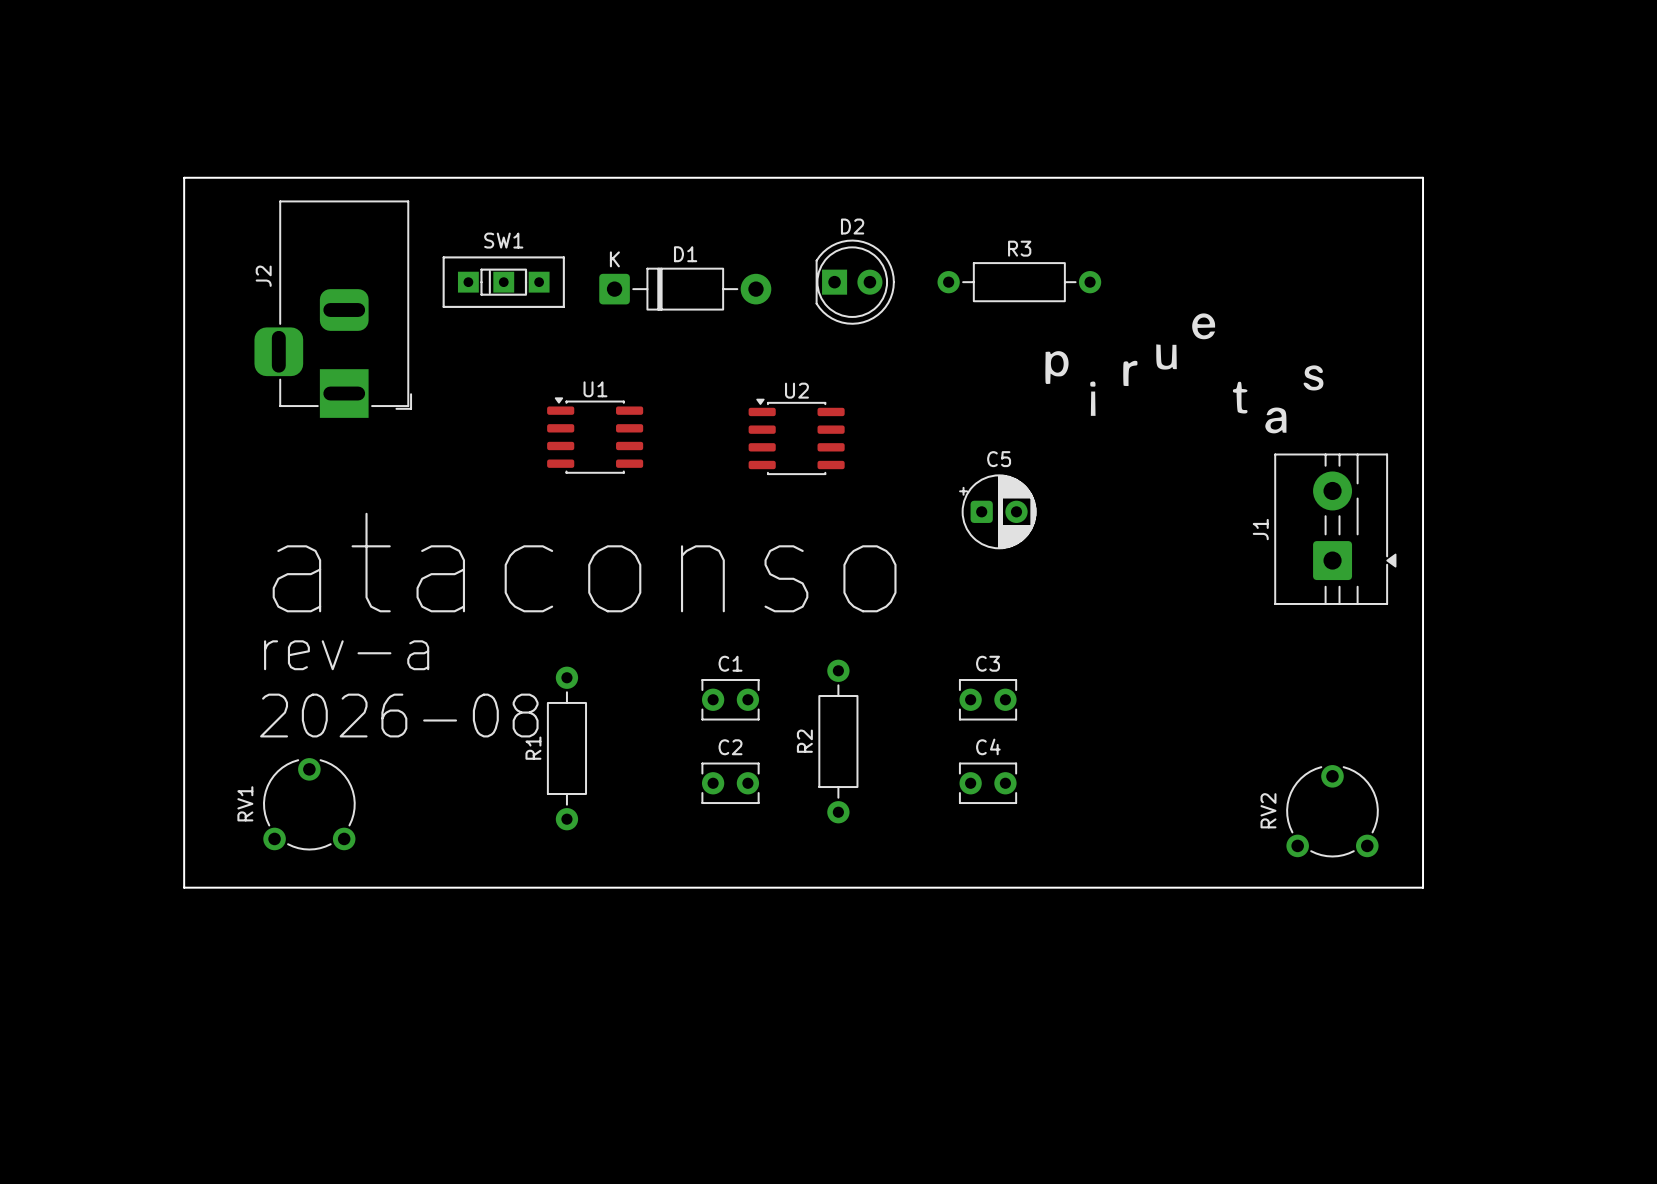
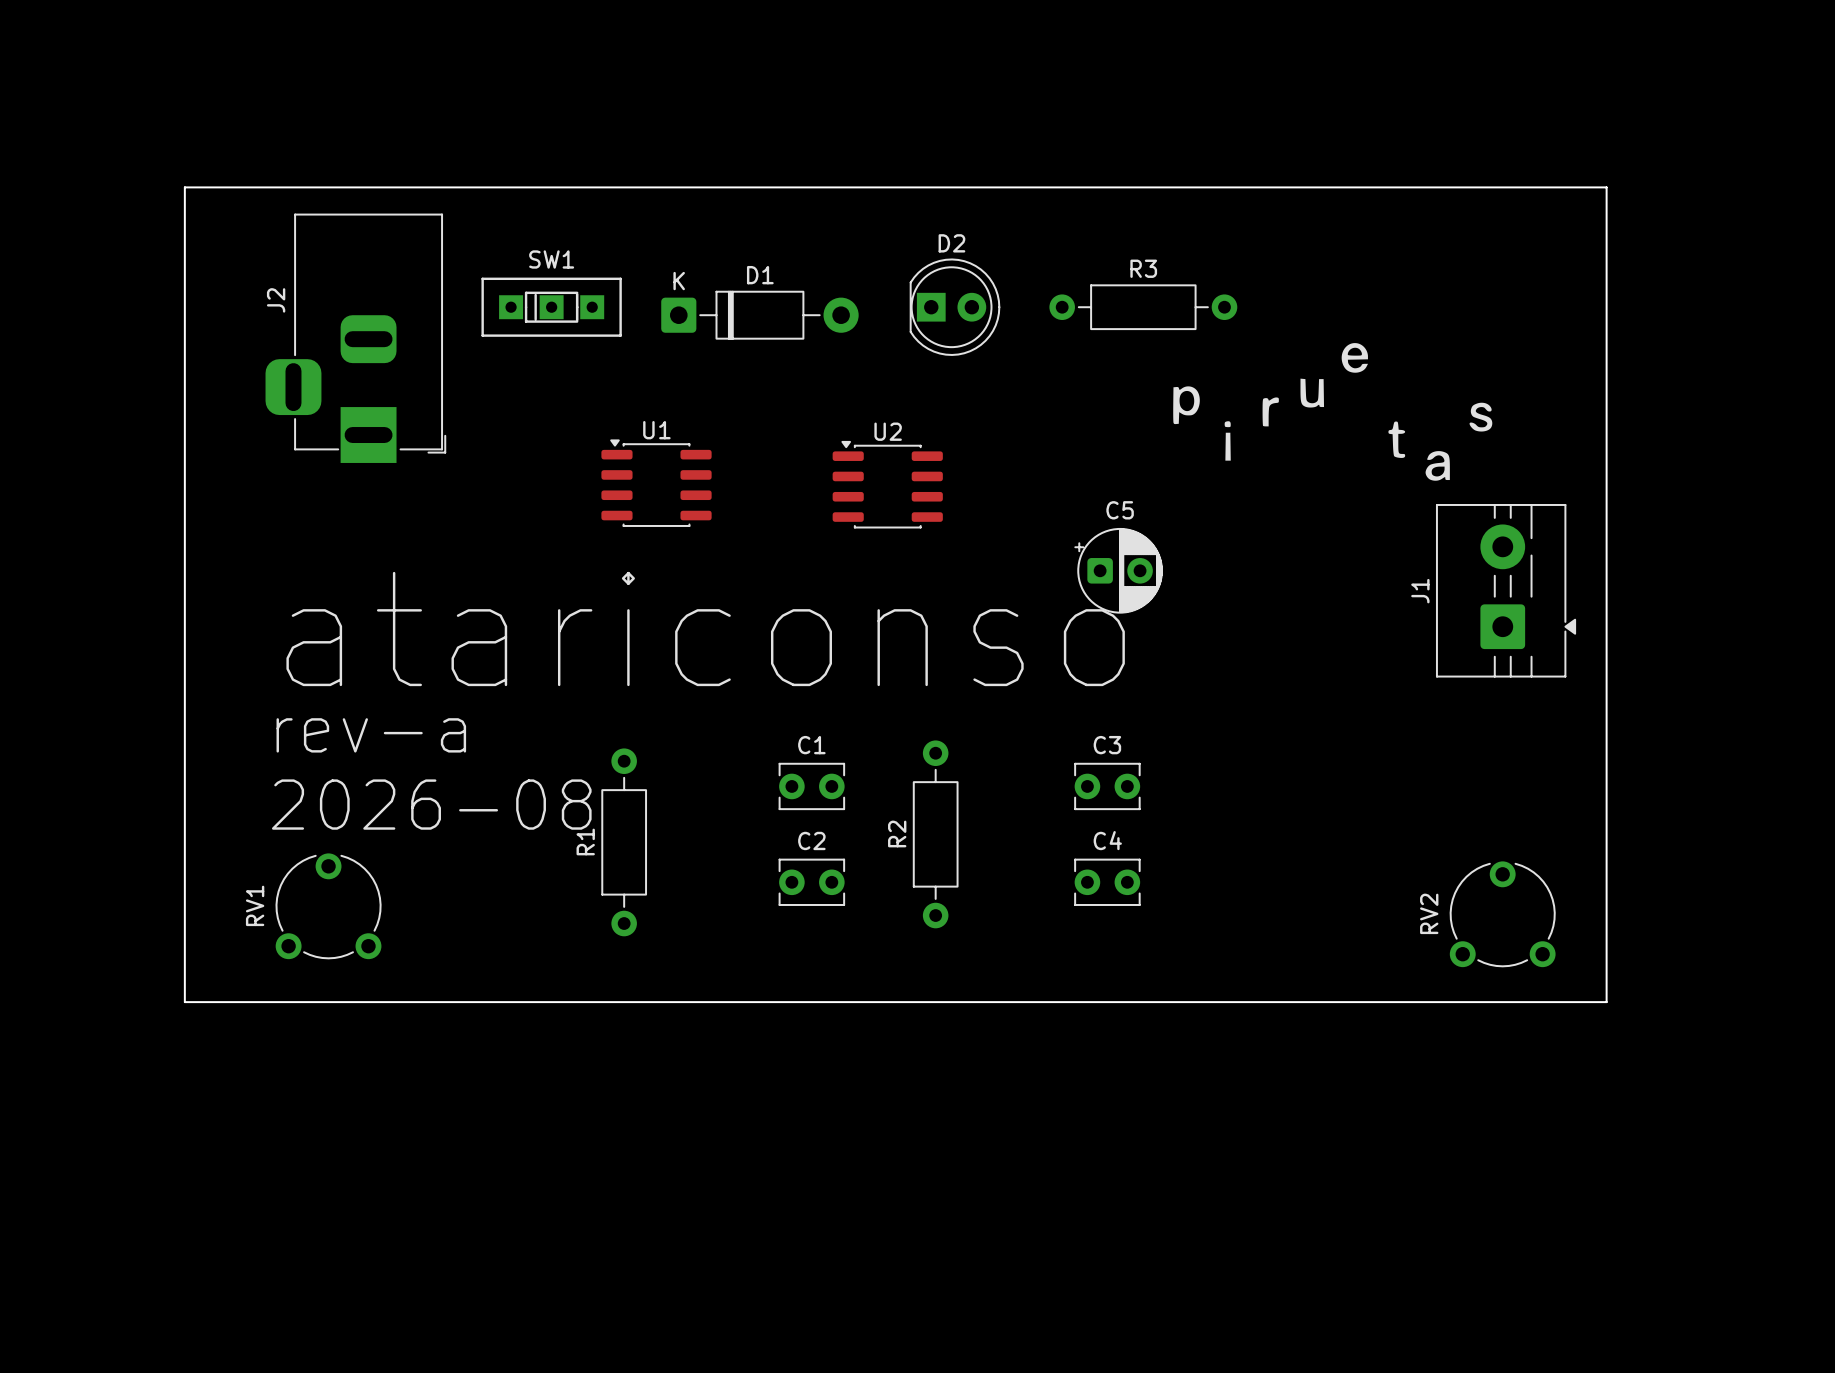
text: ataconso (584, 562) -> atariconso (705, 629)

